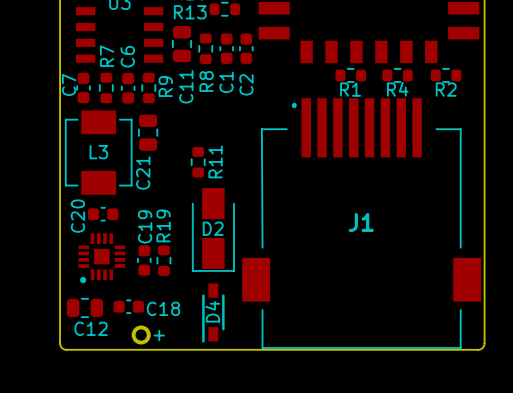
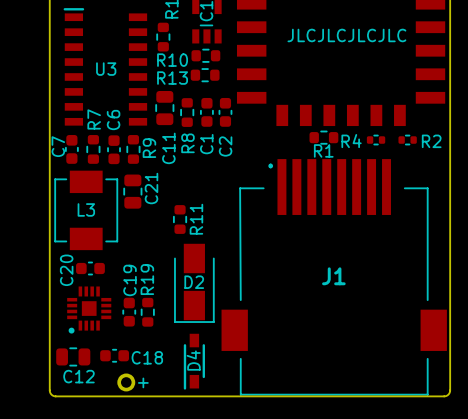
R4 footprint: [382, 68, 413, 83] -> [366, 134, 386, 146]
R2 footprint: [430, 68, 462, 83] -> [398, 134, 417, 146]
R4 name position: R4 (397, 89) -> R4 (351, 141)
R2 name position: R2 (446, 89) -> R2 (431, 141)
C21 name position: C21 (143, 173) -> C21 (151, 188)

